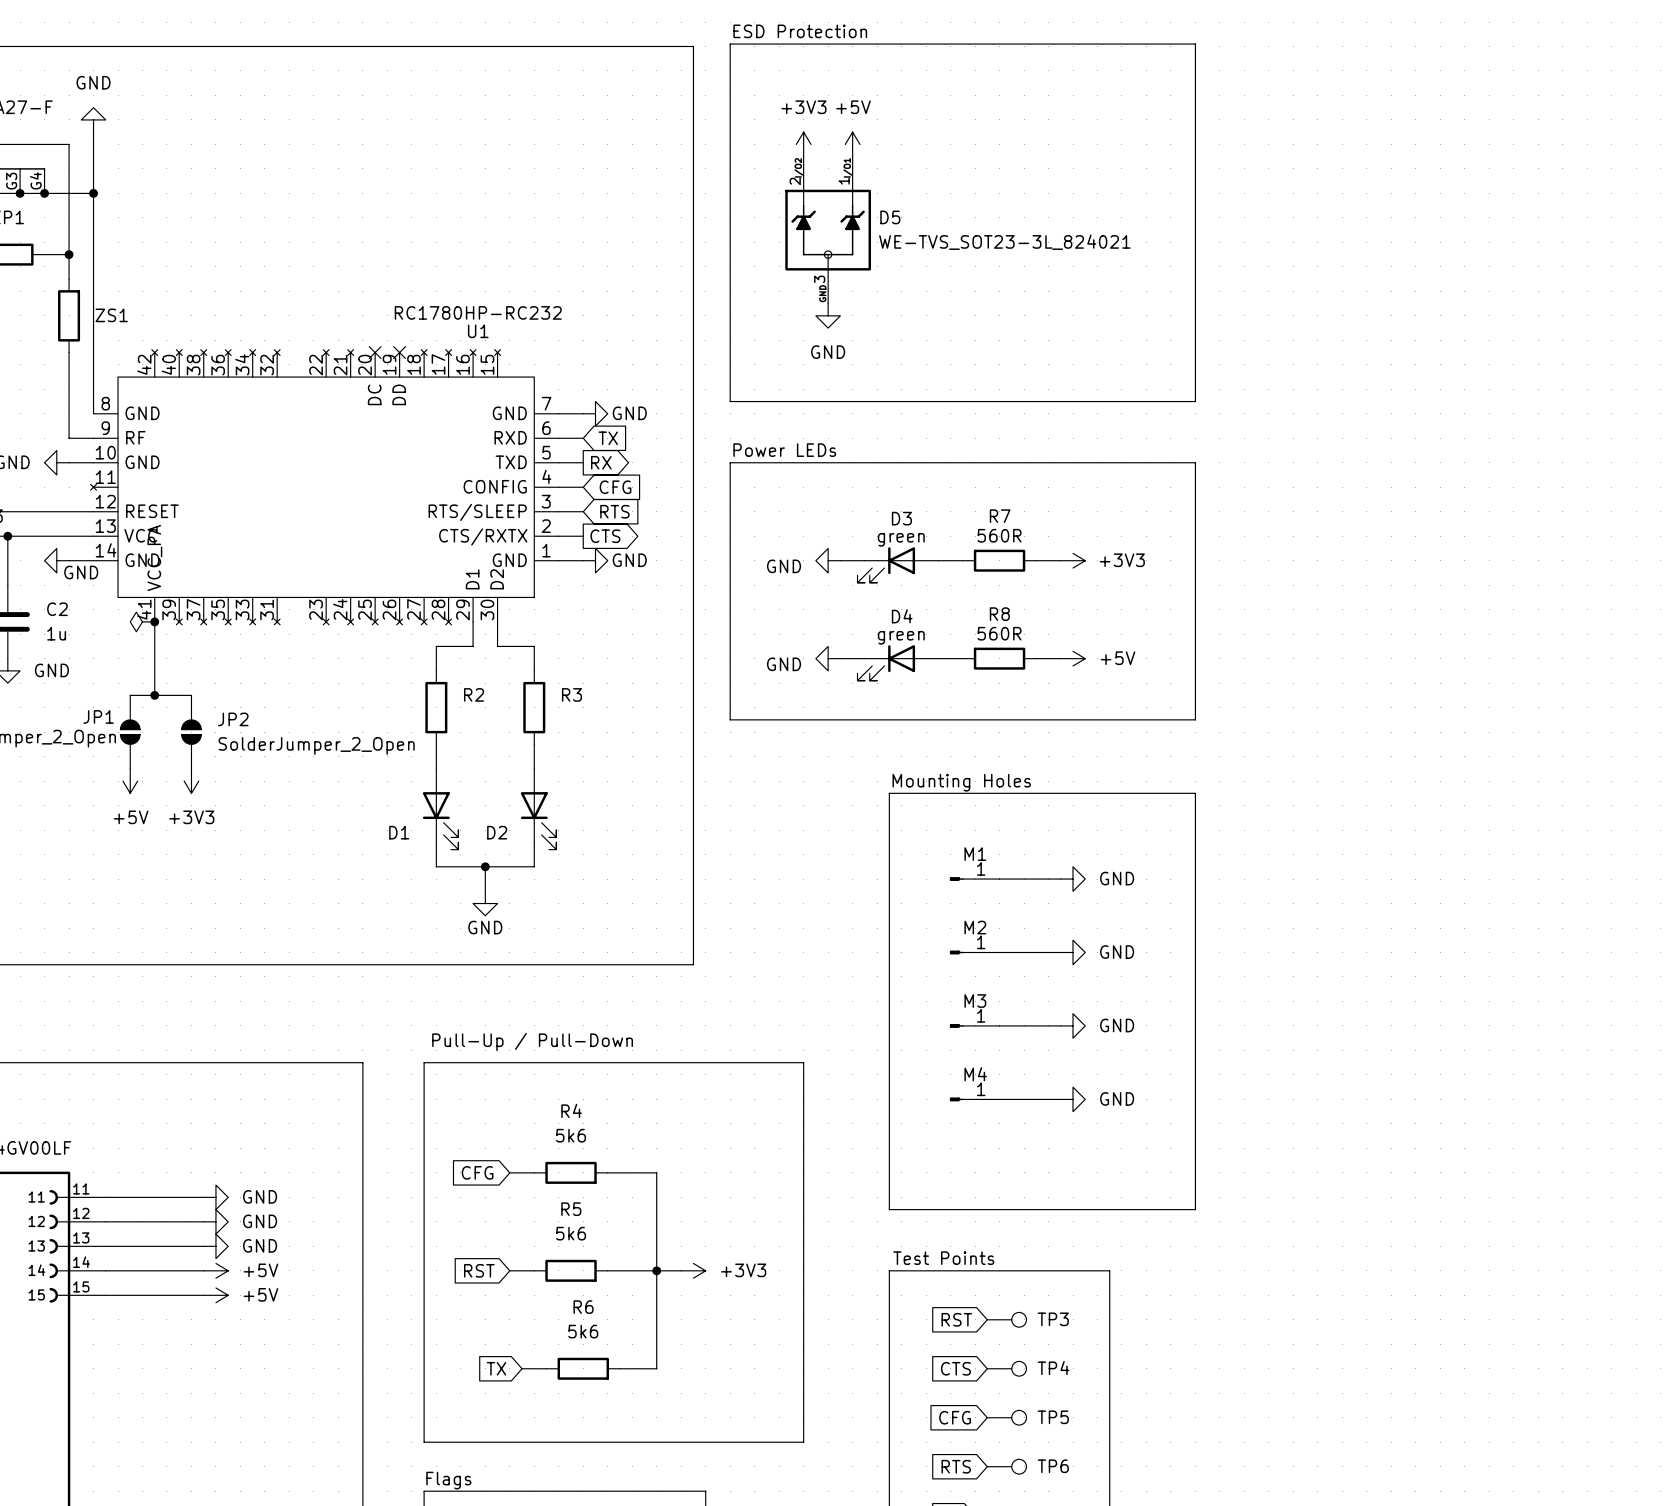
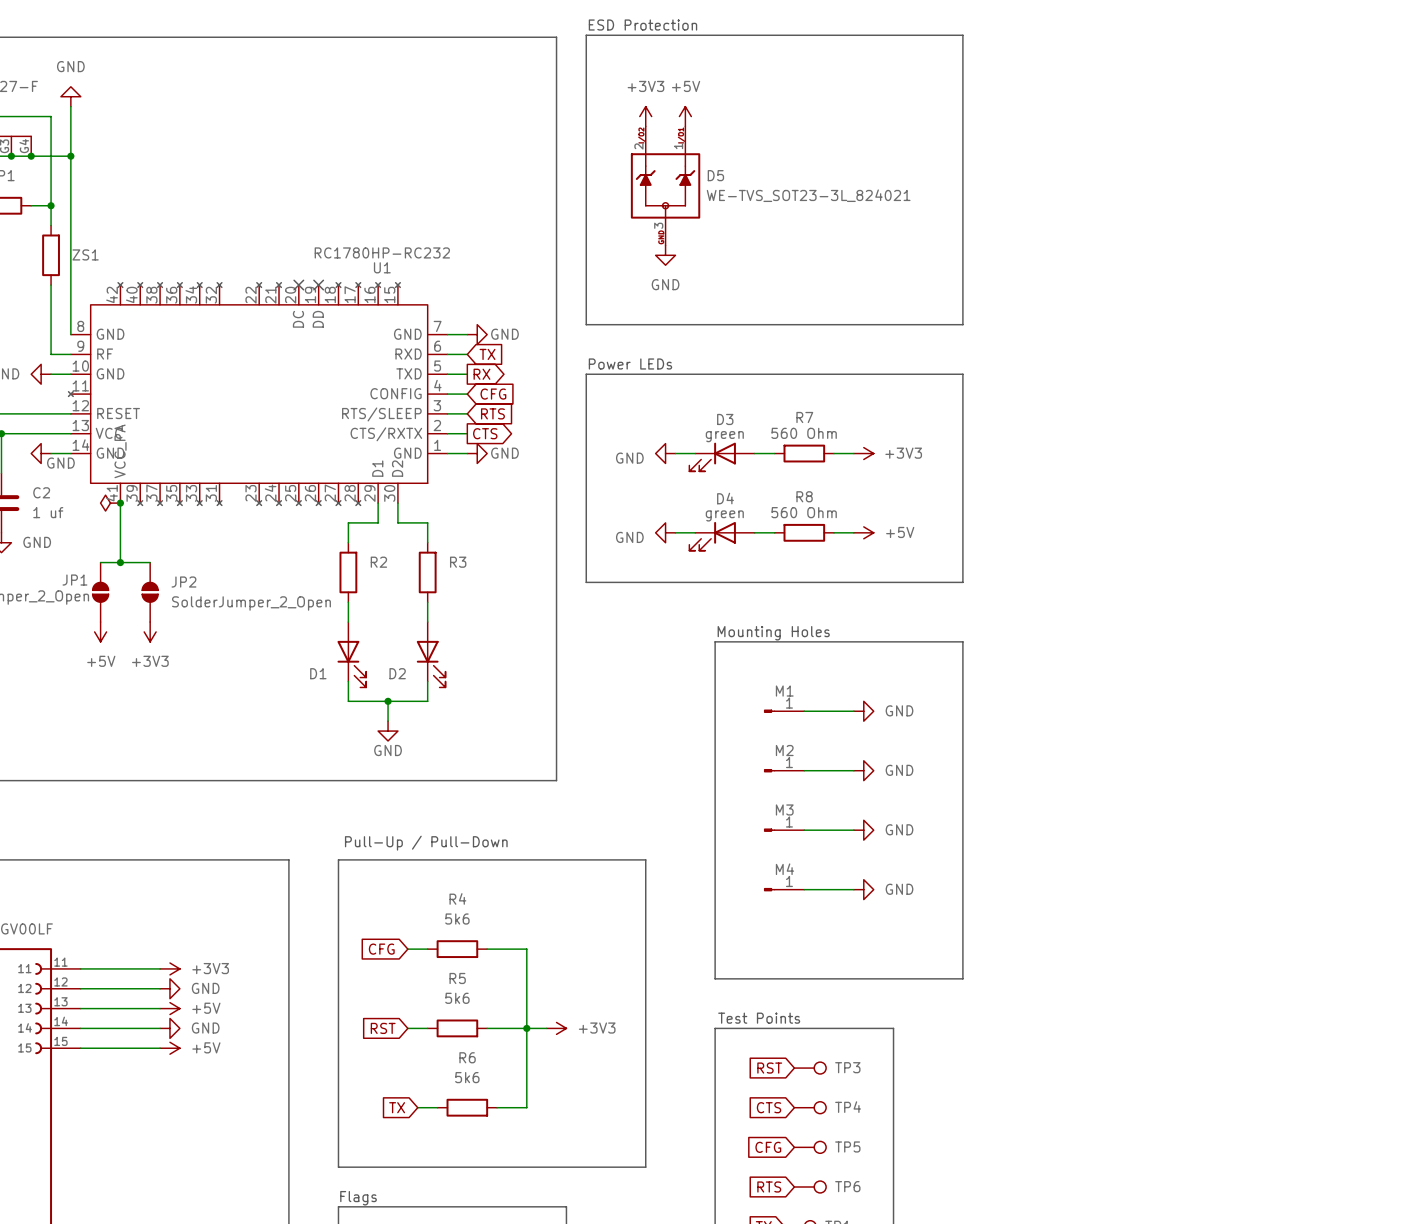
R7 value: 560R (999, 535) -> 560 Ohm (804, 433)
C2 value: 1u (56, 633) -> 1 uf (48, 512)
R8 value: 560R (999, 633) -> 560 Ohm (804, 512)
power symbol: GND (215, 1197) -> +3V3 (169, 968)
power symbol: GND (215, 1246) -> +5V (169, 1008)
power symbol: +5V (215, 1270) -> GND (169, 1028)

